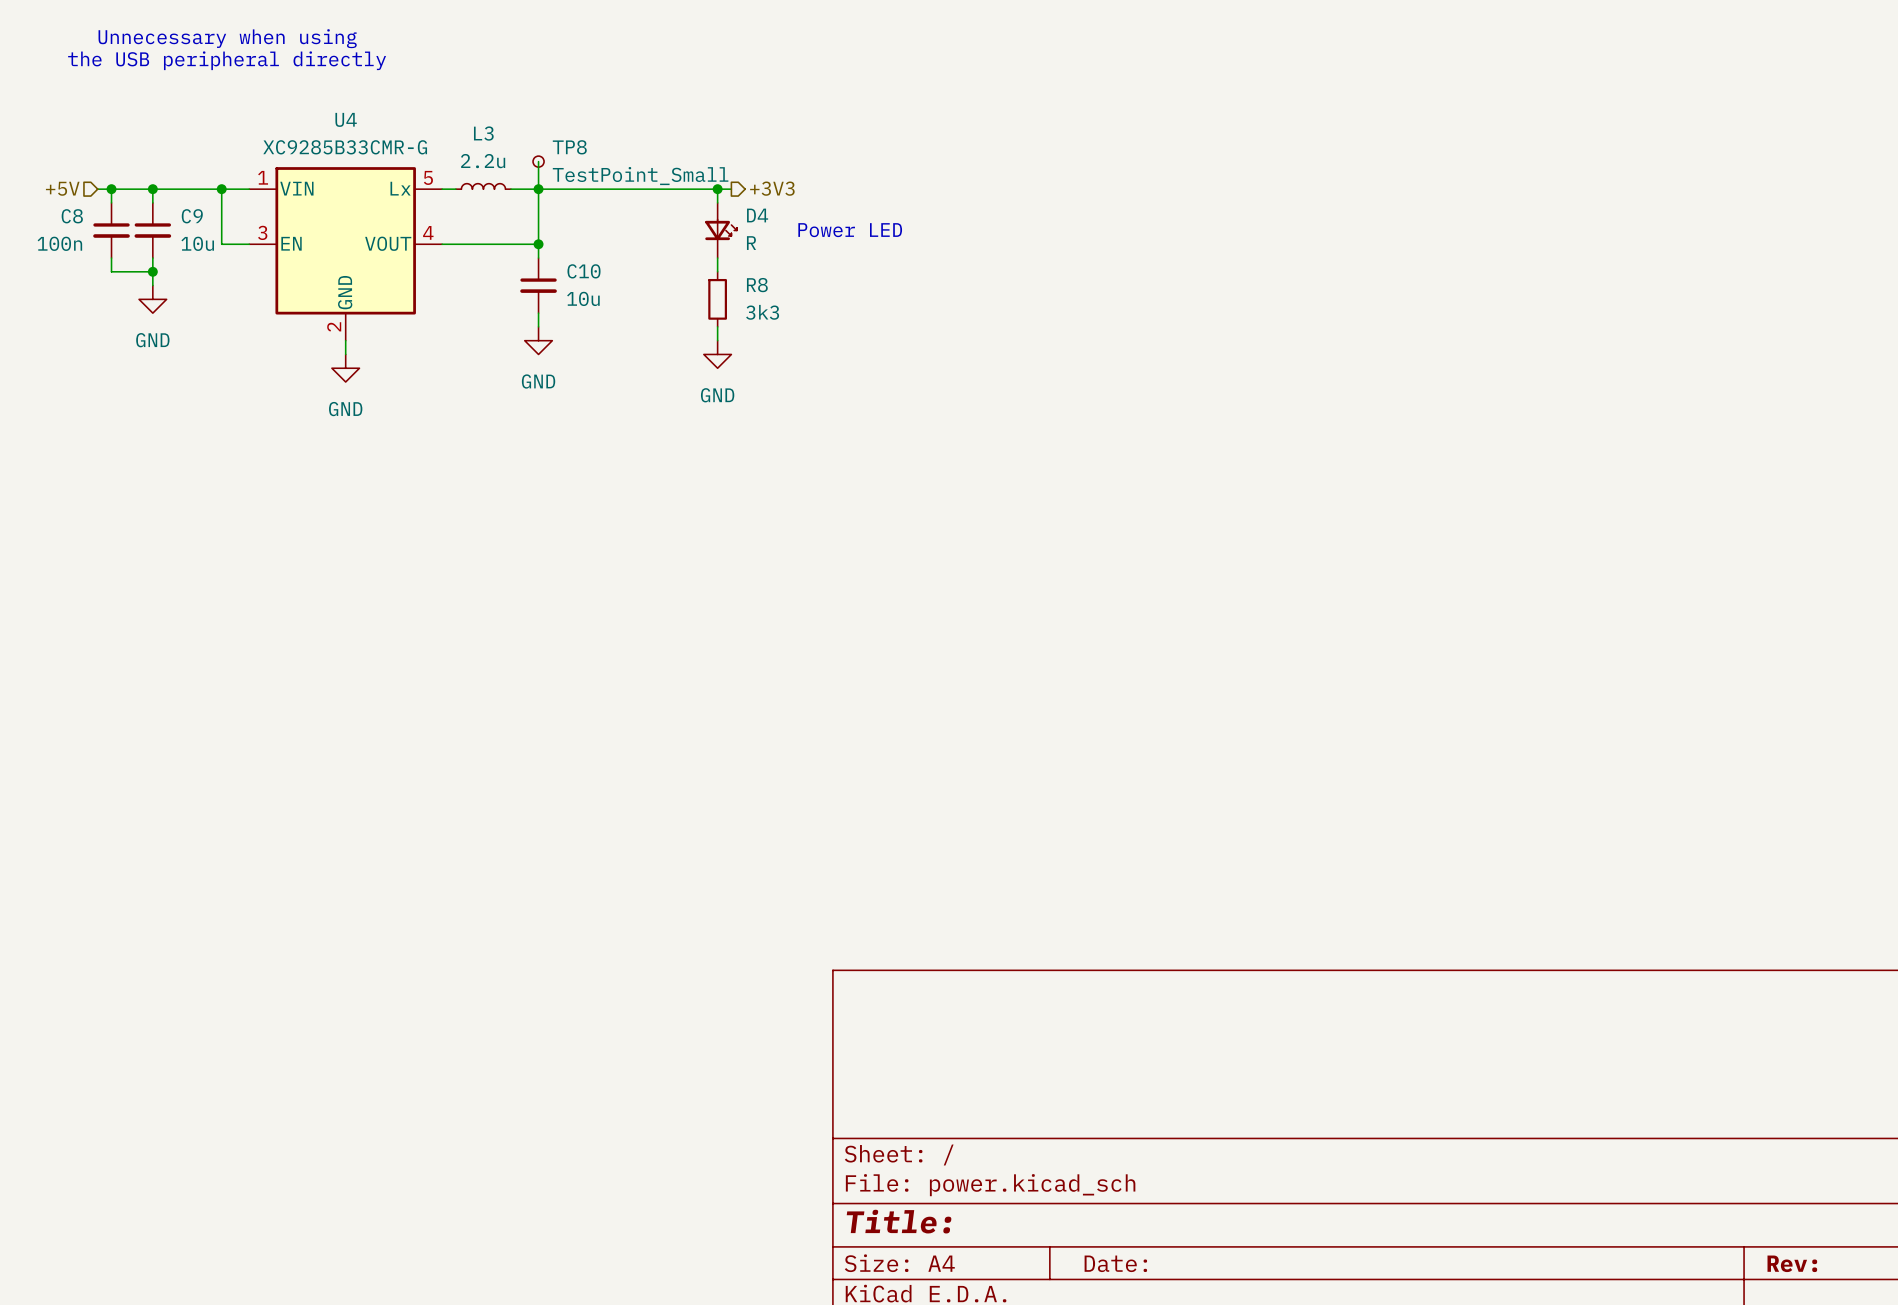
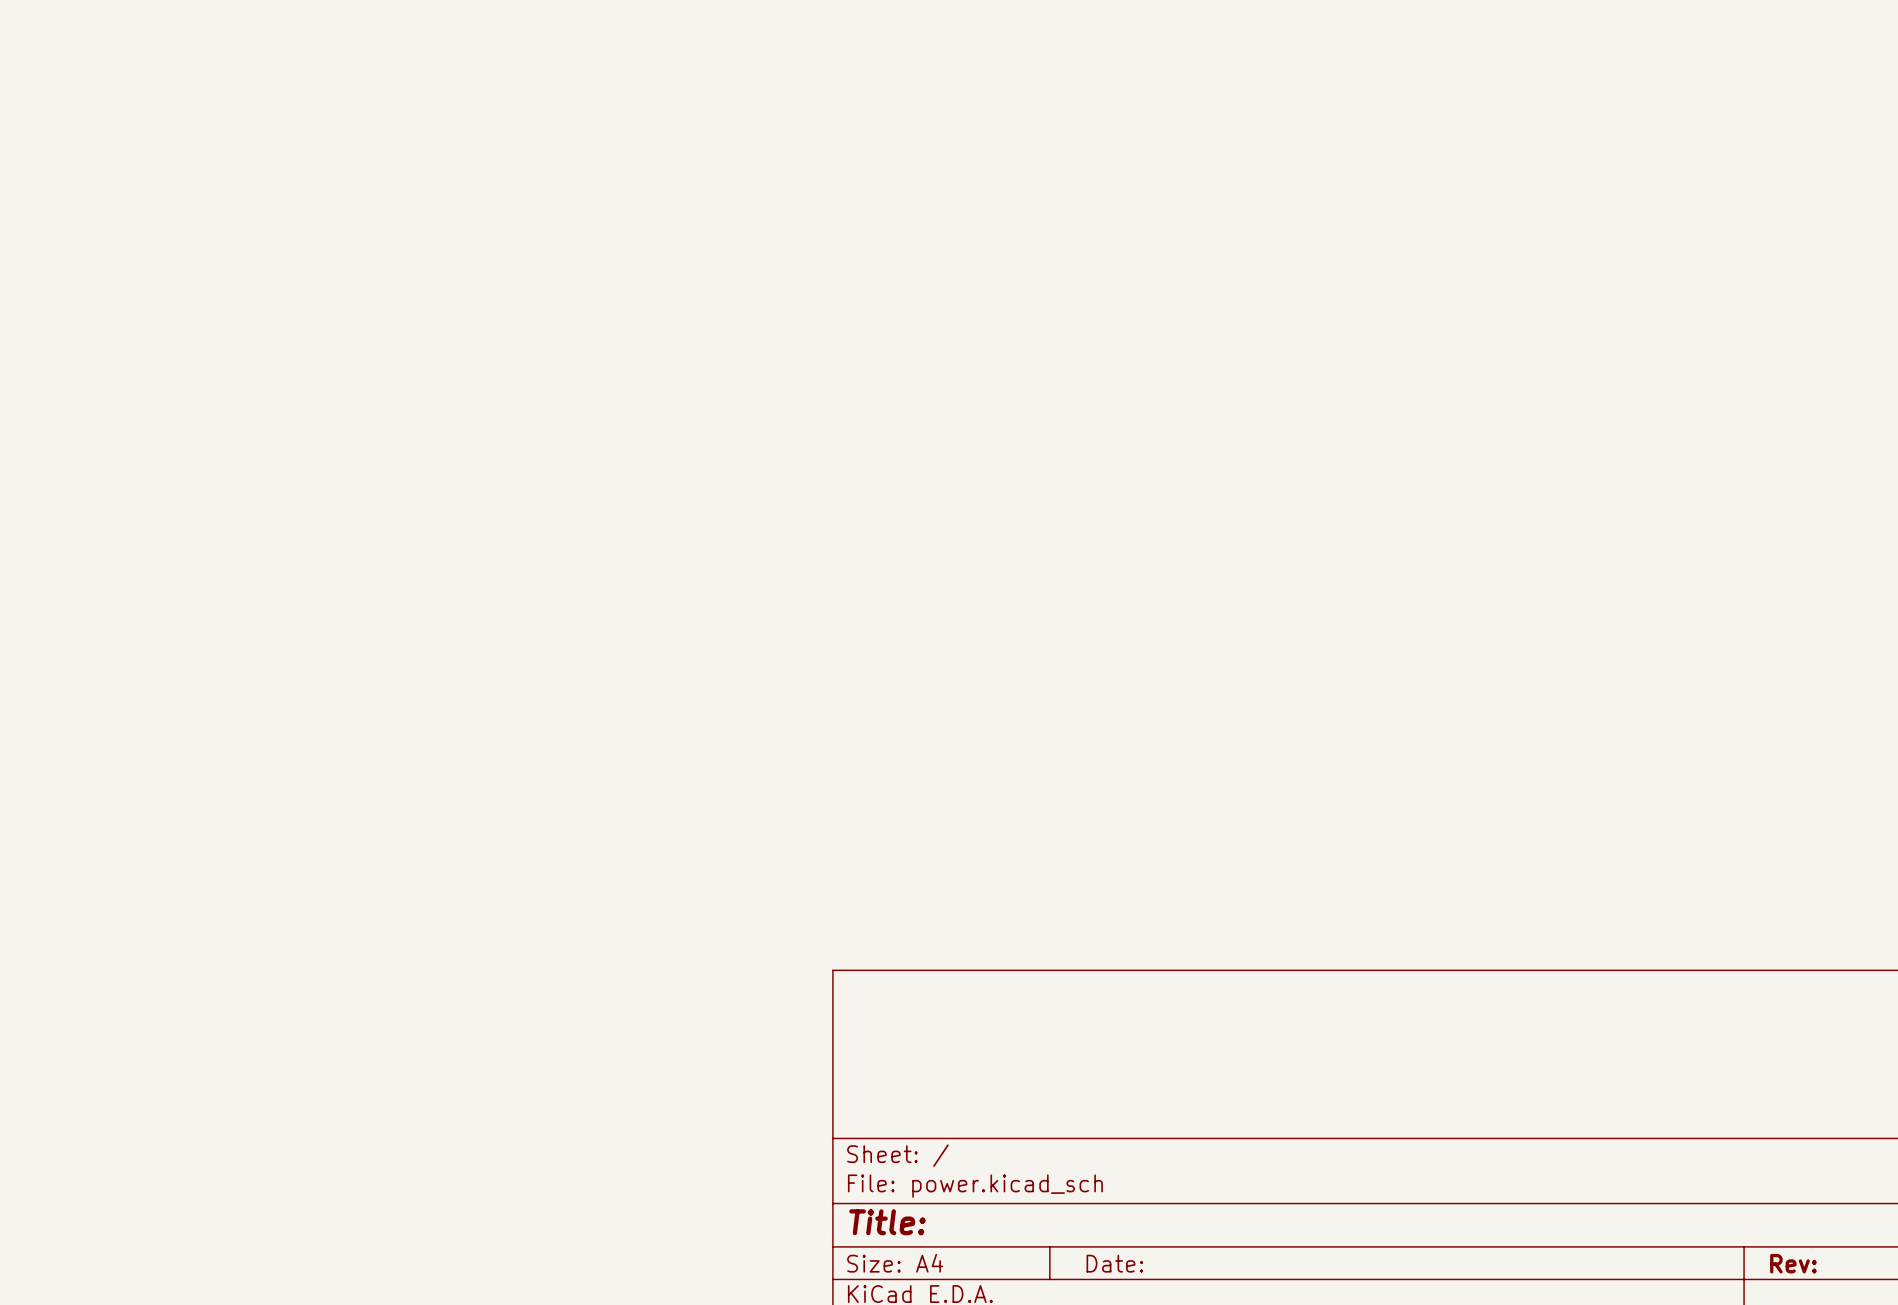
text: Unnecessary when using (227, 38) -> none
text: the USB peripheral directly (227, 60) -> none
wire: (538, 161) (538, 258) -> none
TP8: TestPoint_Small (538, 161) -> none
L3: 2.2u (483, 186) -> none
hierarchical label: +5V (62, 188) -> none
hierarchical label: +3V3 (772, 188) -> none
wire: (97, 189) (249, 189) -> none
wire: (111, 189) (111, 202) -> none
junction: (111, 189) -> none
wire: (152, 189) (152, 202) -> none
junction: (152, 189) -> none
wire: (221, 189) (221, 244) (249, 244) -> none
junction: (221, 189) -> none
wire: (442, 189) (455, 189) -> none
wire: (510, 189) (731, 189) -> none
junction: (538, 189) -> none
wire: (717, 189) (717, 202) -> none
junction: (717, 189) -> none
C8: 100n (111, 230) -> none
C9: 10u (152, 230) -> none
D4: R (721, 230) -> none
text: Power LED (850, 230) -> none
wire: (442, 244) (538, 244) -> none
junction: (538, 244) -> none
U4: XC9285B33CMR-G (345, 253) -> none
wire: (111, 258) (111, 271) (152, 271) -> none
wire: (152, 258) (152, 285) -> none
wire: (717, 258) (717, 271) -> none
junction: (152, 271) -> none
C10: 10u (538, 285) -> none
power symbol: GND (152, 299) -> none
R8: 3k3 (717, 299) -> none
wire: (538, 313) (538, 326) -> none
wire: (717, 326) (717, 340) -> none
wire: (345, 340) (345, 354) -> none
power symbol: GND (538, 340) -> none
power symbol: GND (717, 354) -> none
power symbol: GND (345, 368) -> none

